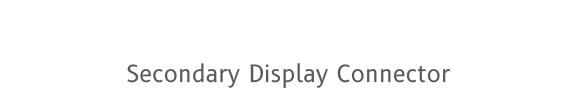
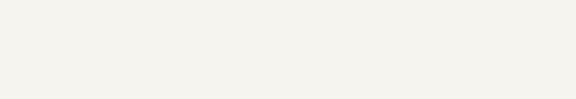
text: Secondary Display Connector (288, 75) -> none

